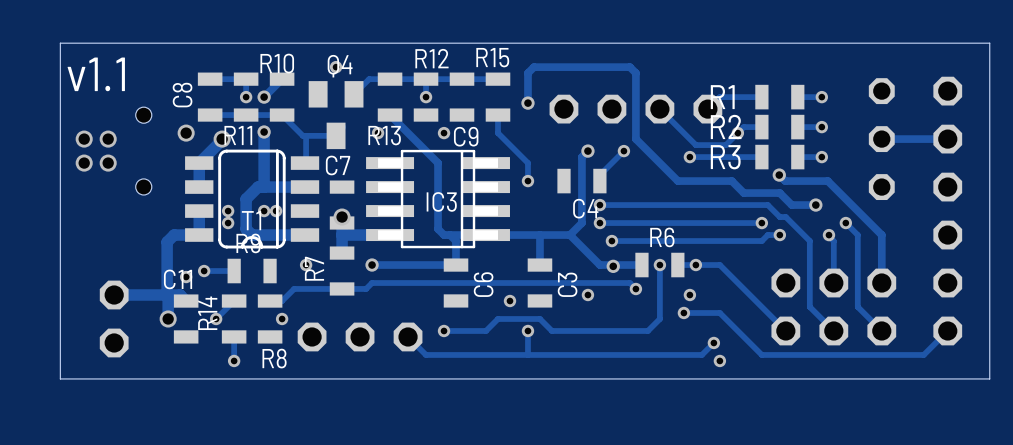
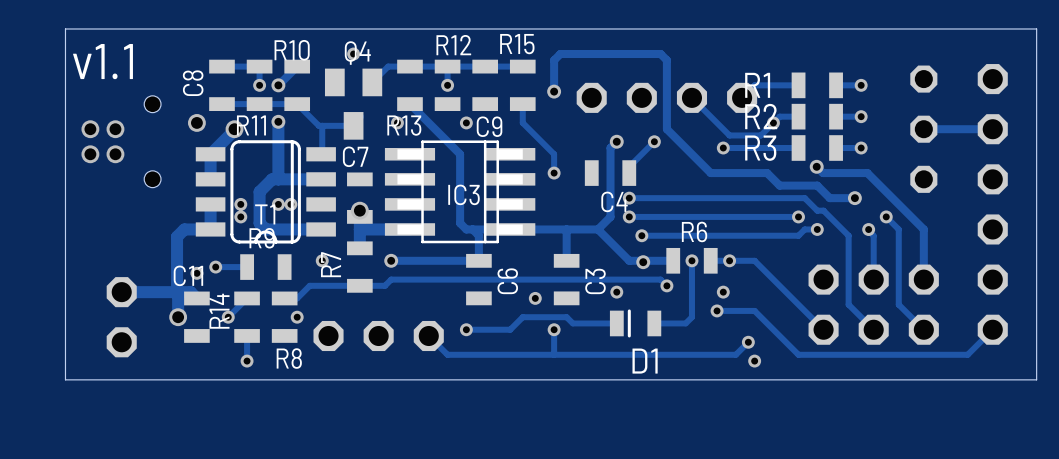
D1: none -> (635, 323)
track: (653, 324) (647, 330) (551, 330) (545, 324) -> (616, 323) (572, 323)
track: none -> (685, 323) (654, 323)

